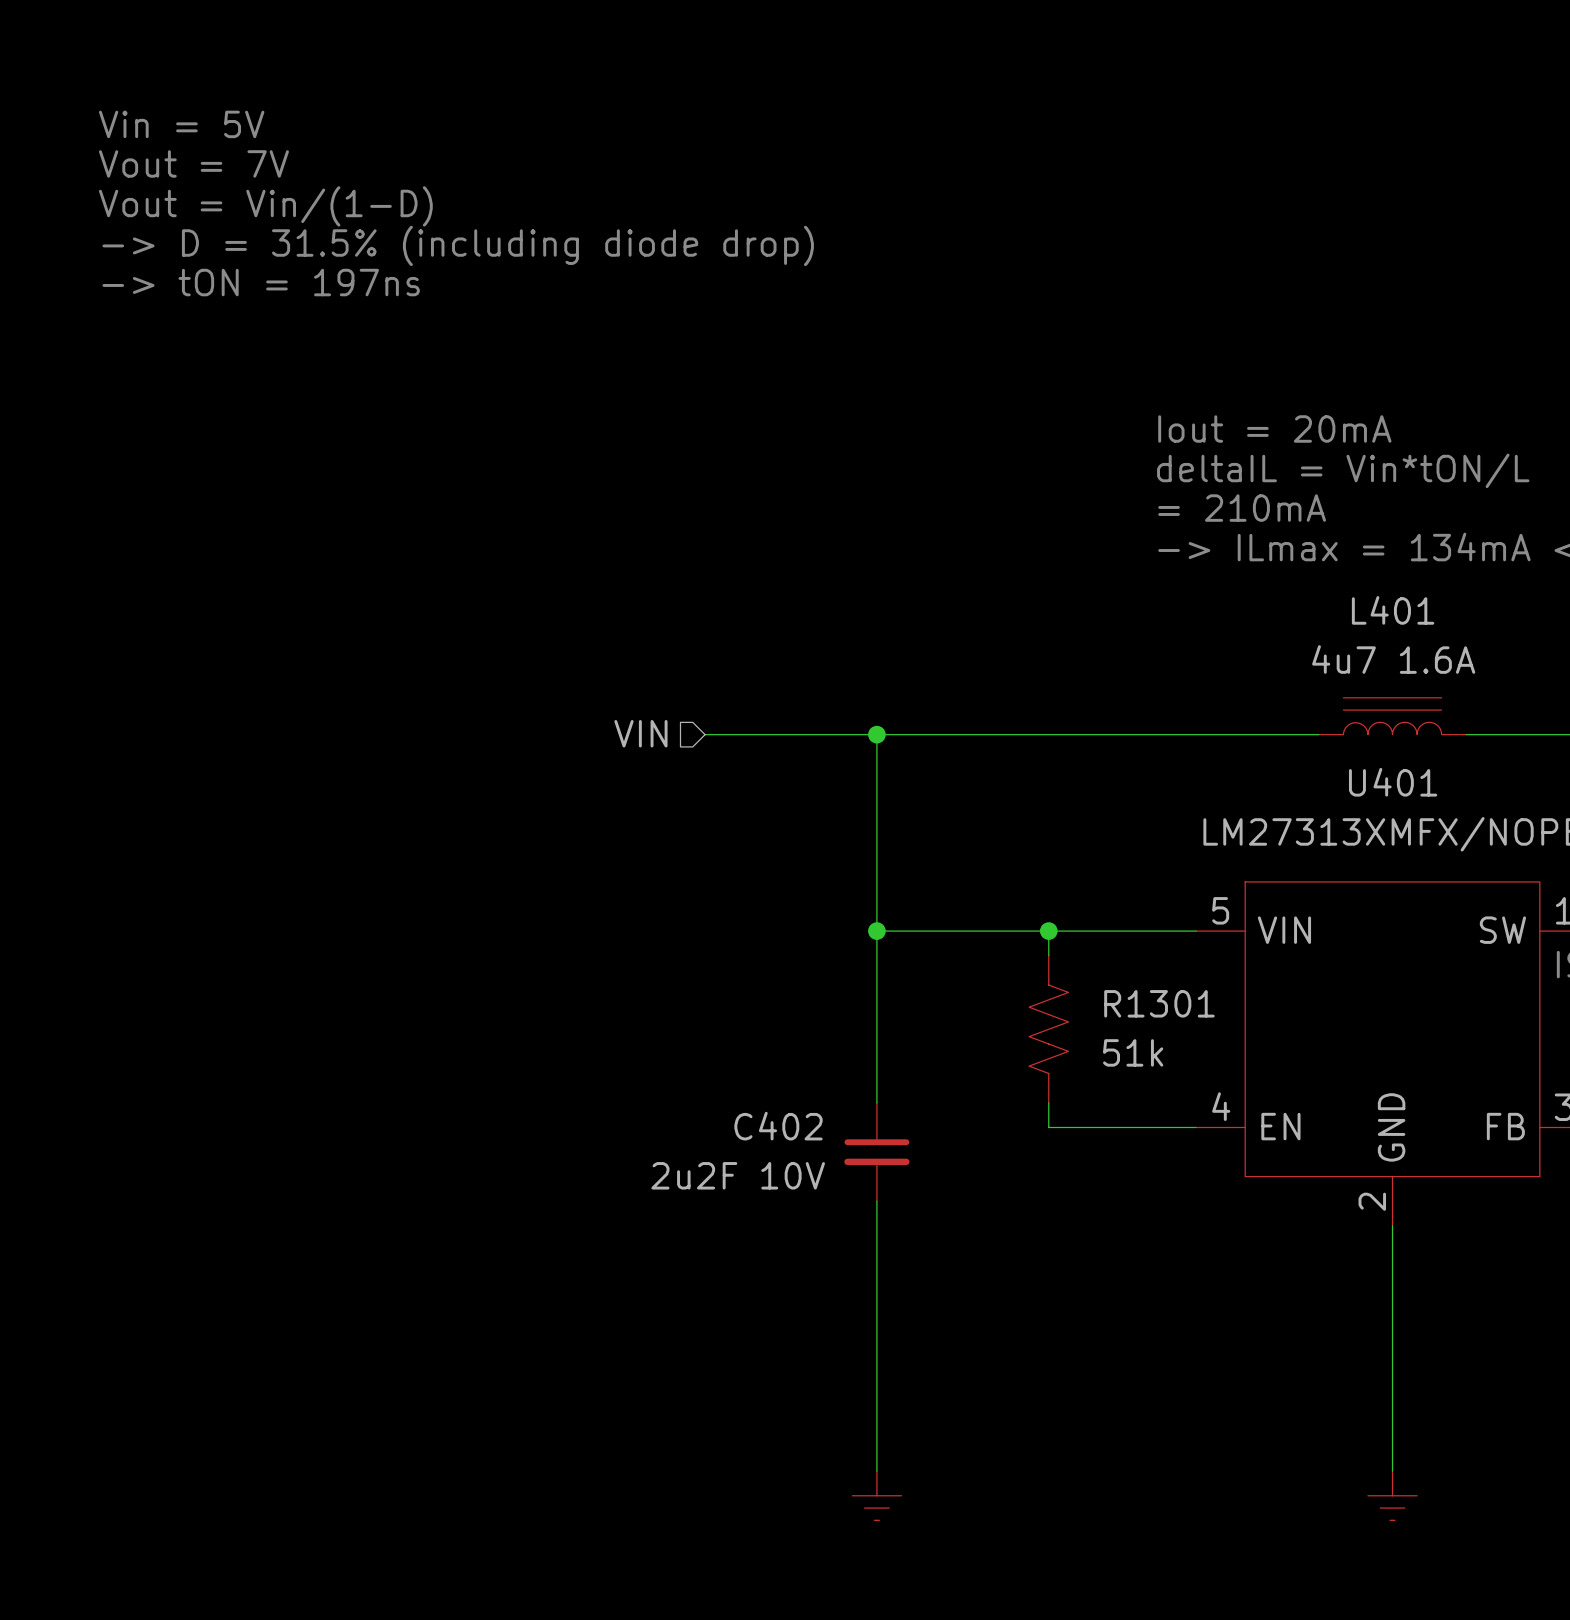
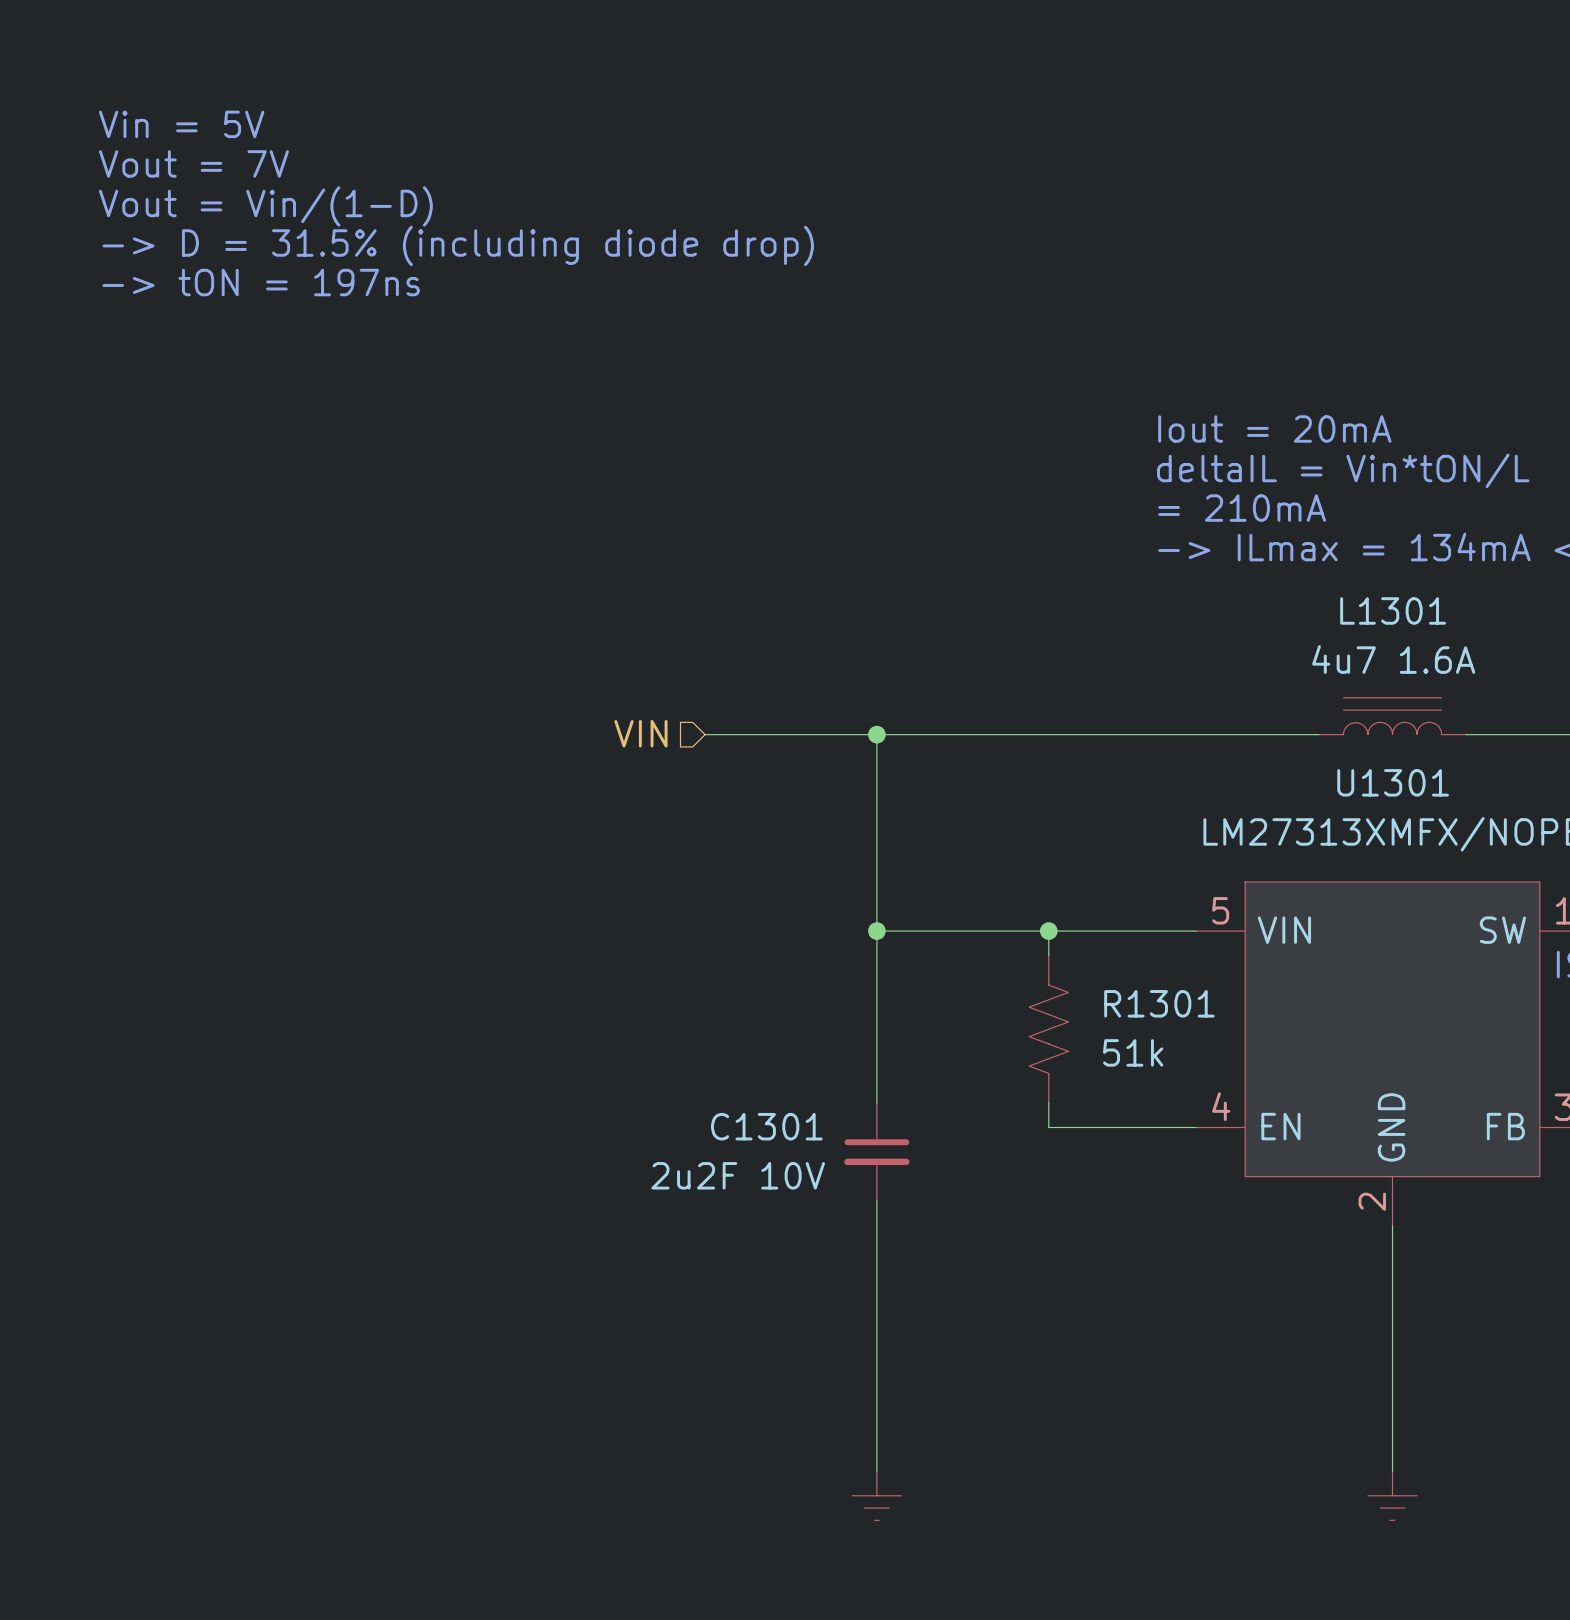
L401 name: L401 (1393, 610) -> L1301 (1393, 610)
U401 name: U401 (1393, 782) -> U1301 (1393, 782)
C402 name: C402 (778, 1126) -> C1301 (766, 1126)

